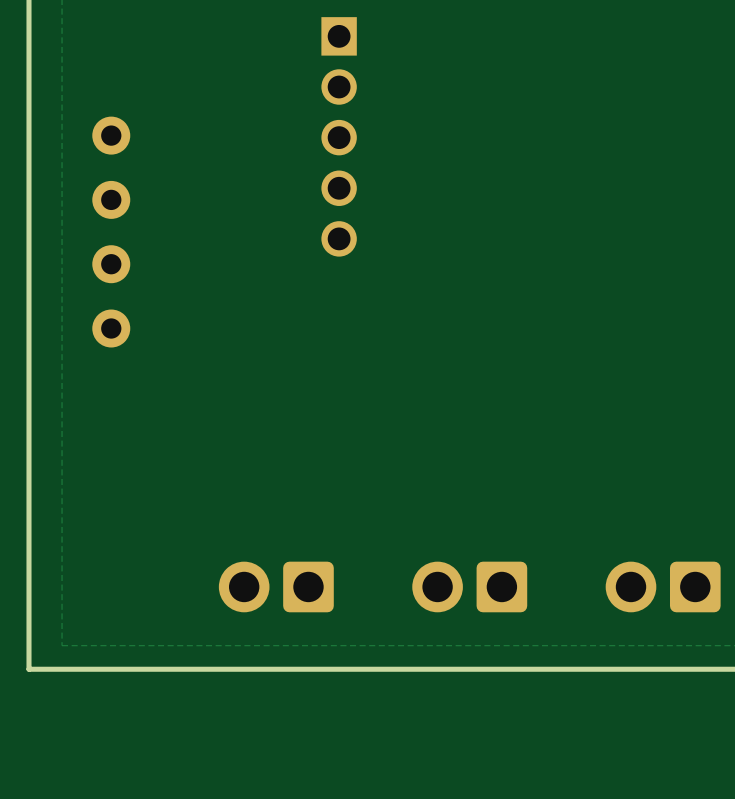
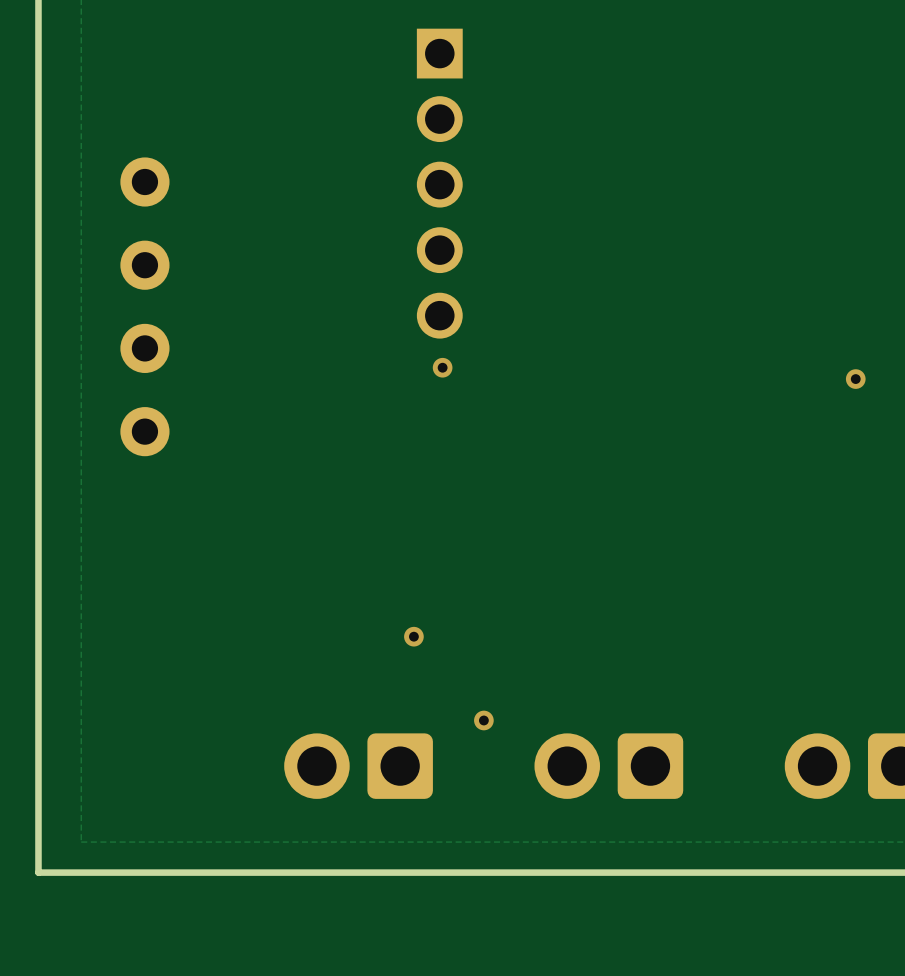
via: none -> (442, 367)
via: none -> (855, 379)
via: none -> (413, 636)
via: none -> (483, 720)

